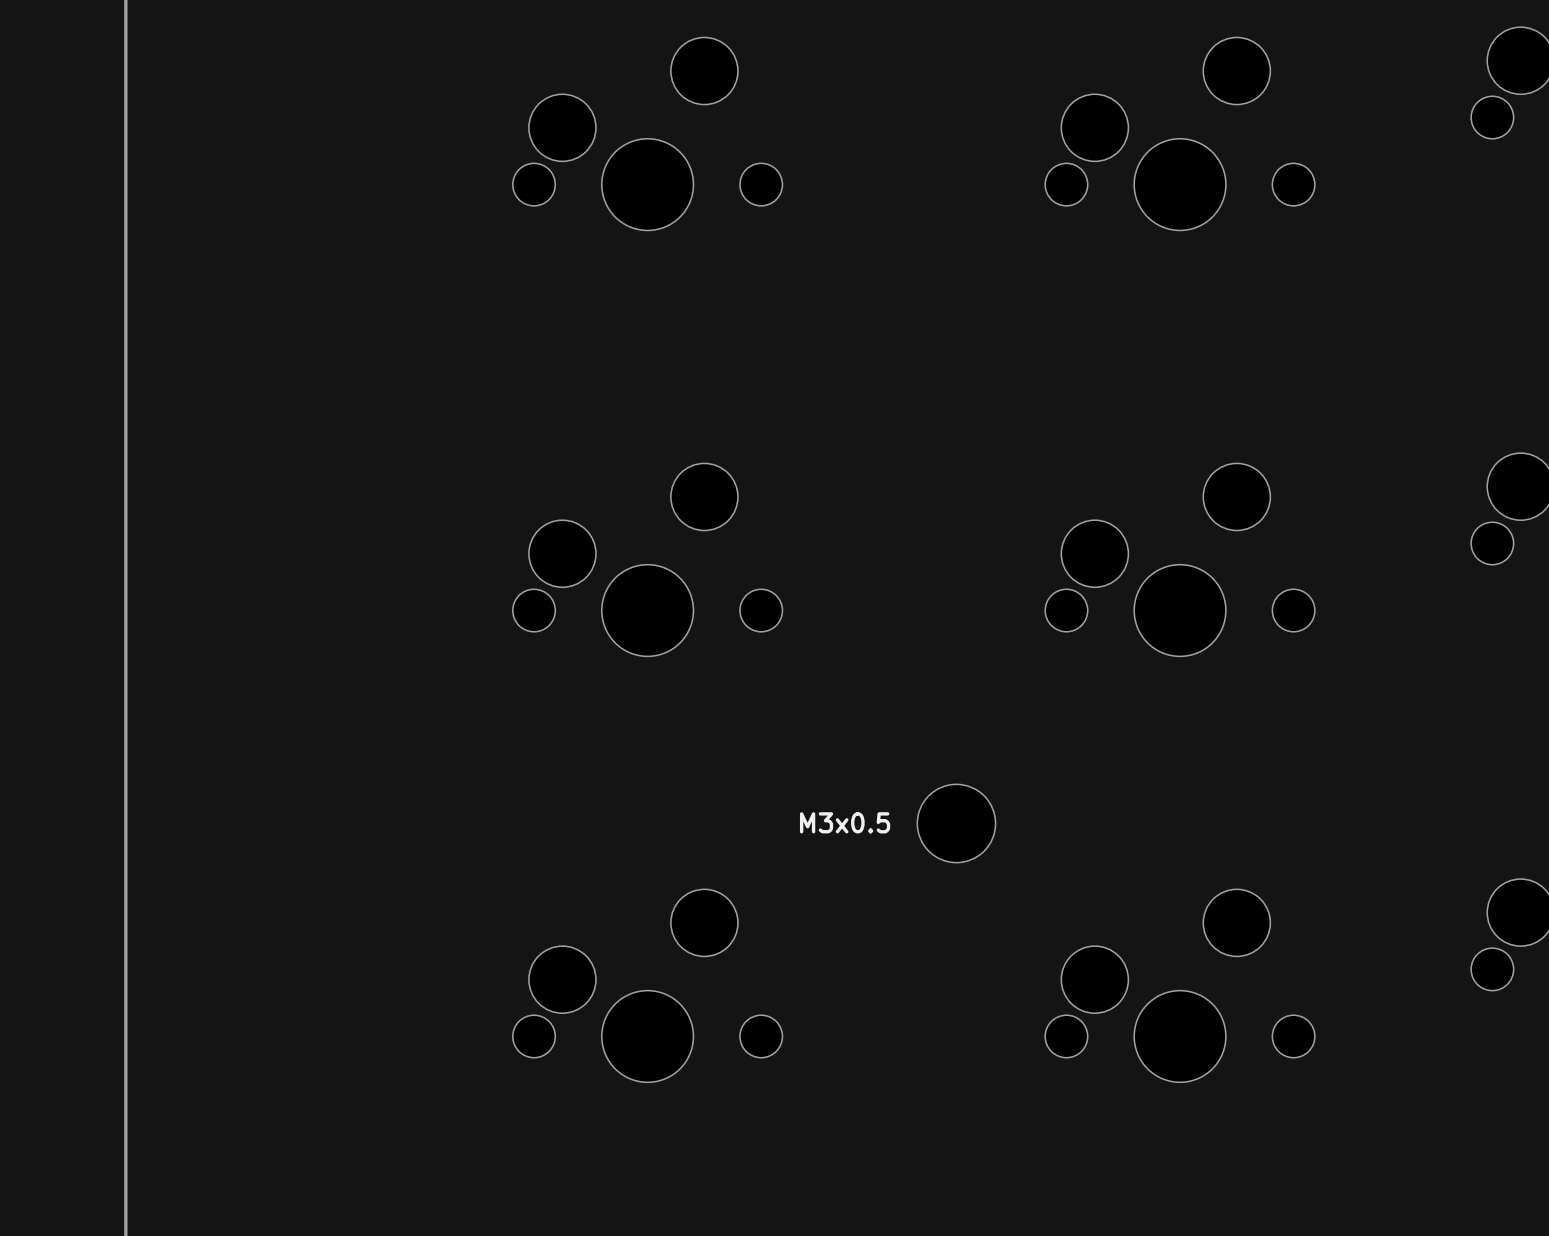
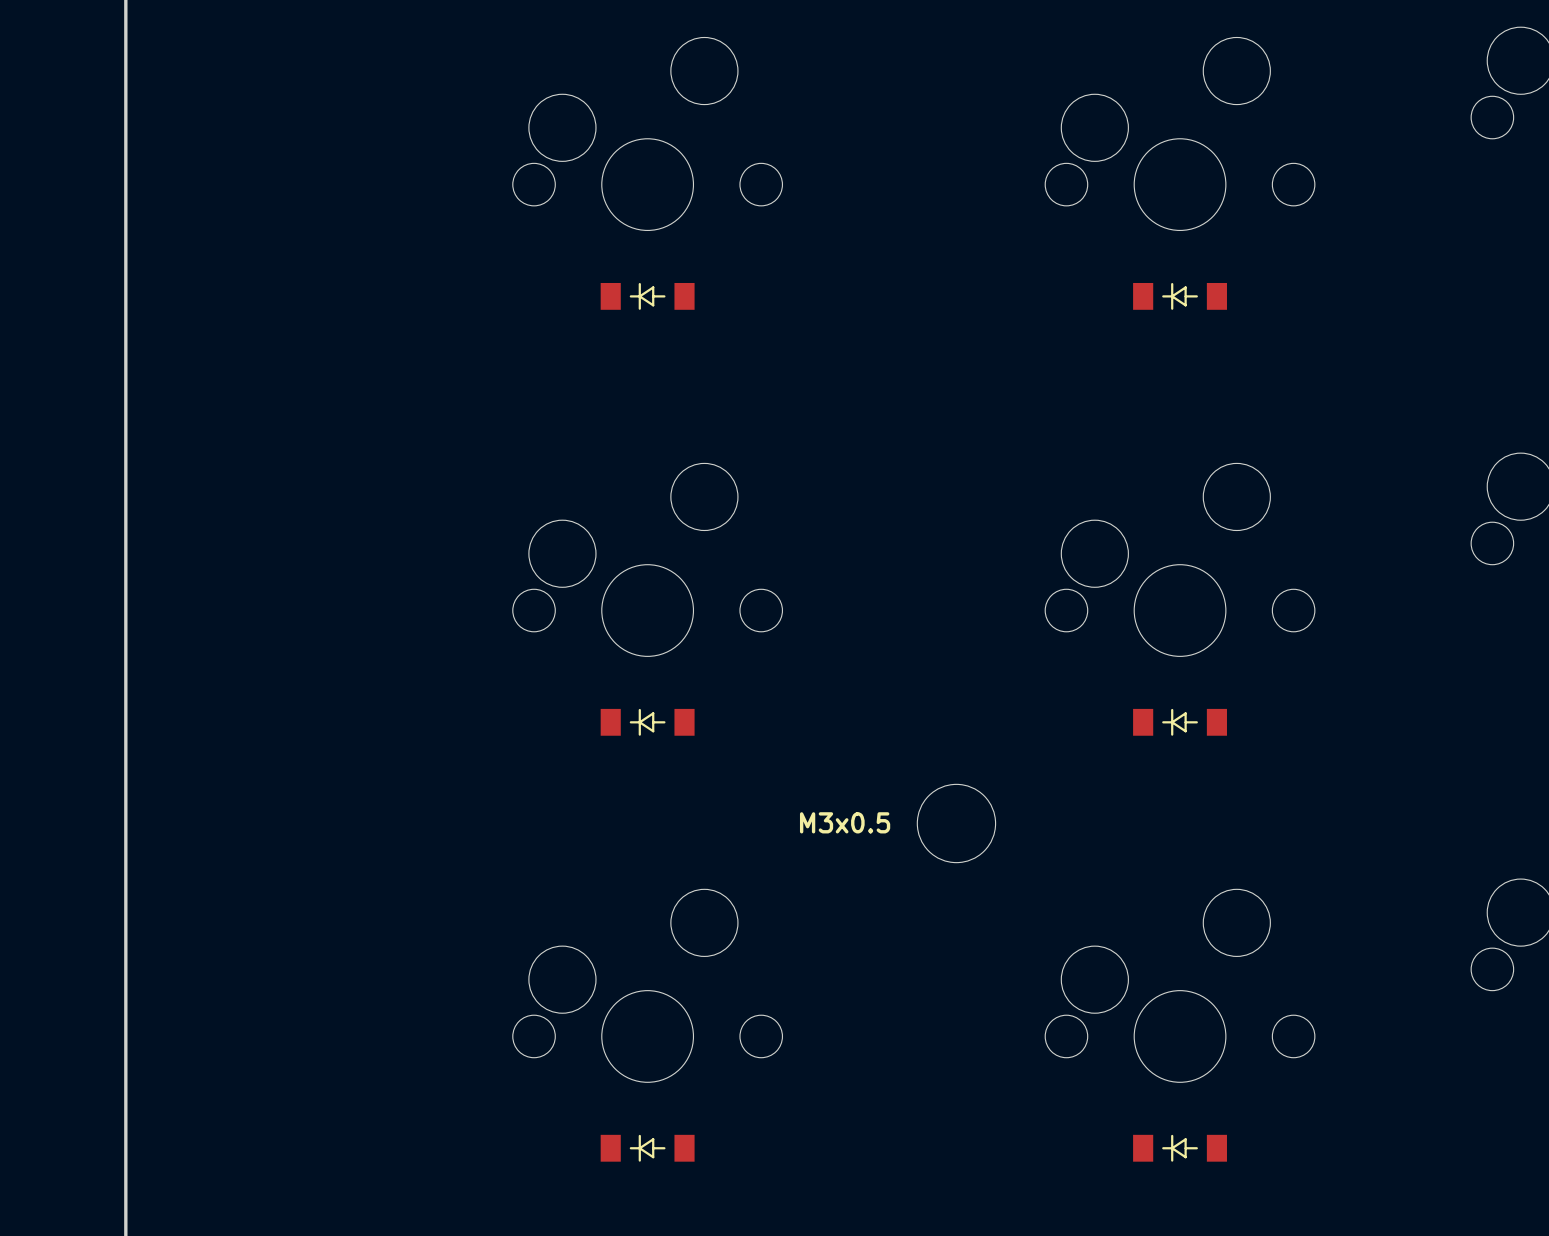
part: none -> (647, 296)
part: none -> (1180, 296)
part: none -> (647, 722)
part: none -> (1180, 722)
part: none -> (647, 1148)
part: none -> (1180, 1148)

